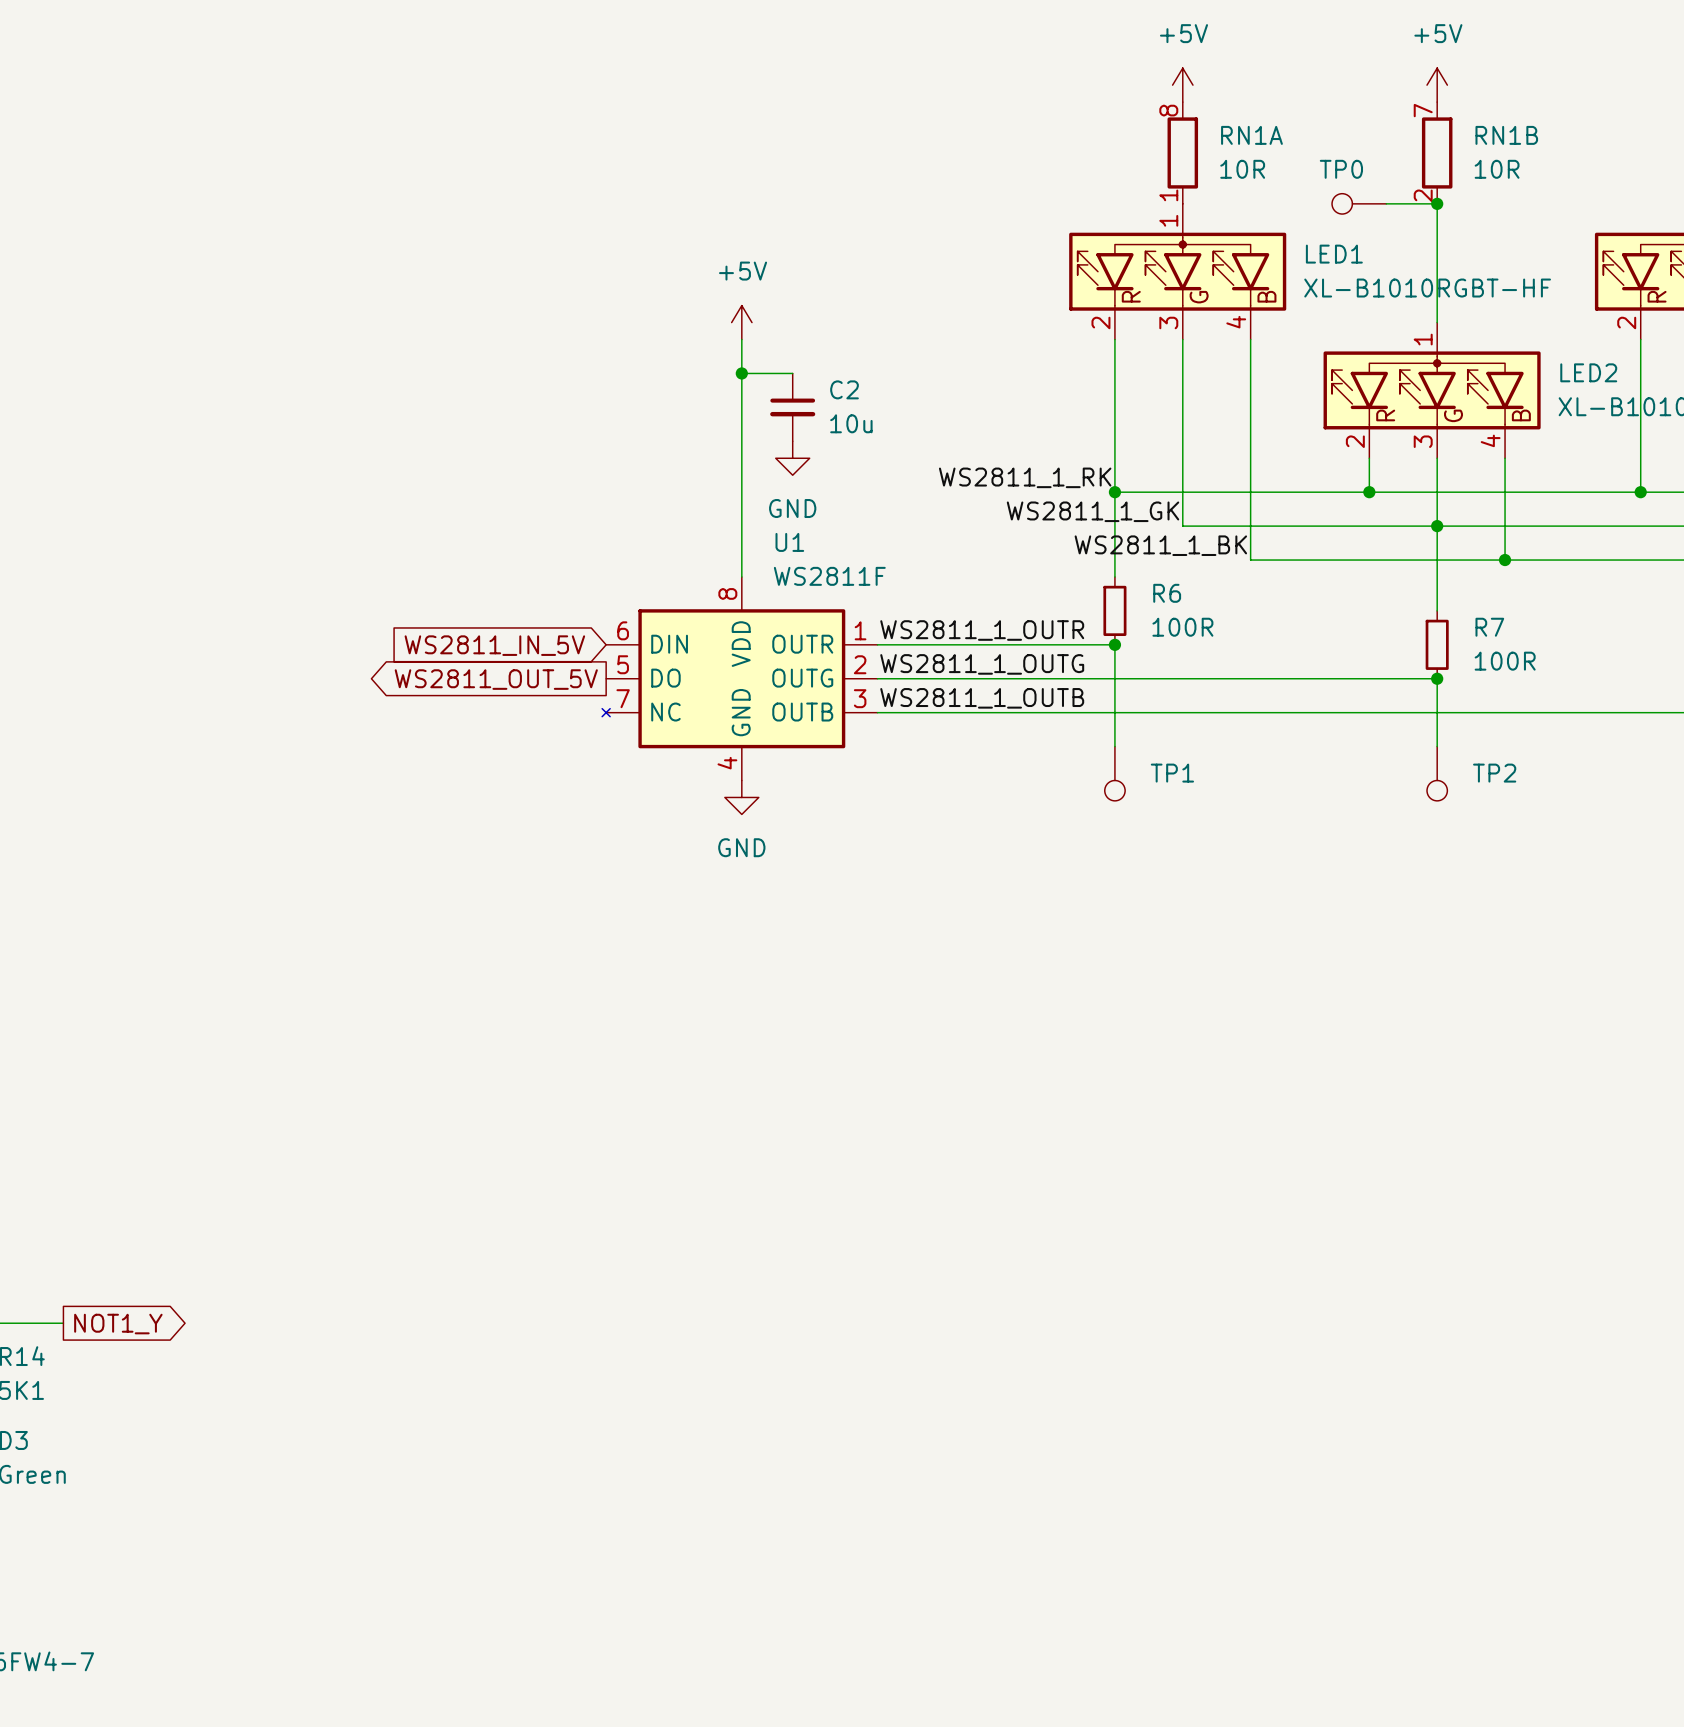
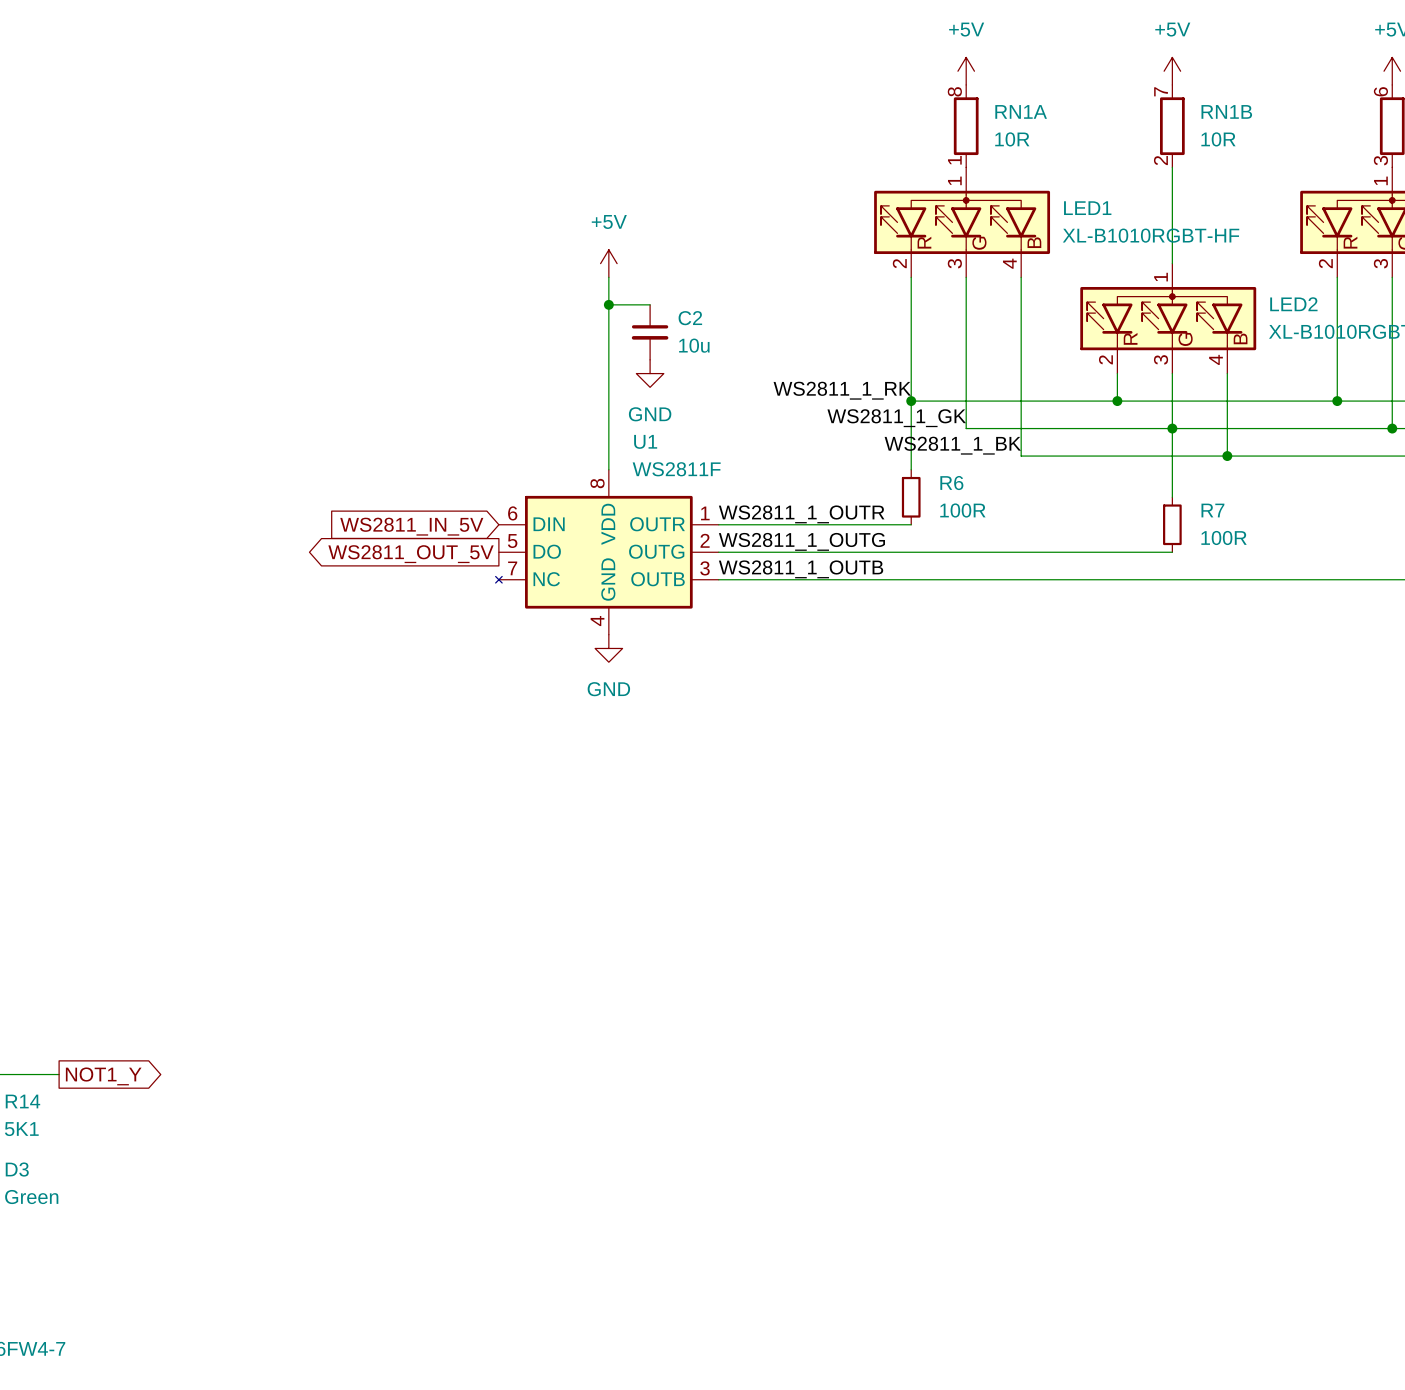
TP0: (1359, 203) -> none
wire: (1386, 203) (1437, 203) -> none
junction: (1437, 203) -> none
wire: (1114, 644) (1114, 746) -> none
junction: (1114, 644) -> none
wire: (1437, 678) (1437, 746) -> none
junction: (1437, 678) -> none
TP1: (1114, 773) -> none
TP2: (1437, 773) -> none

